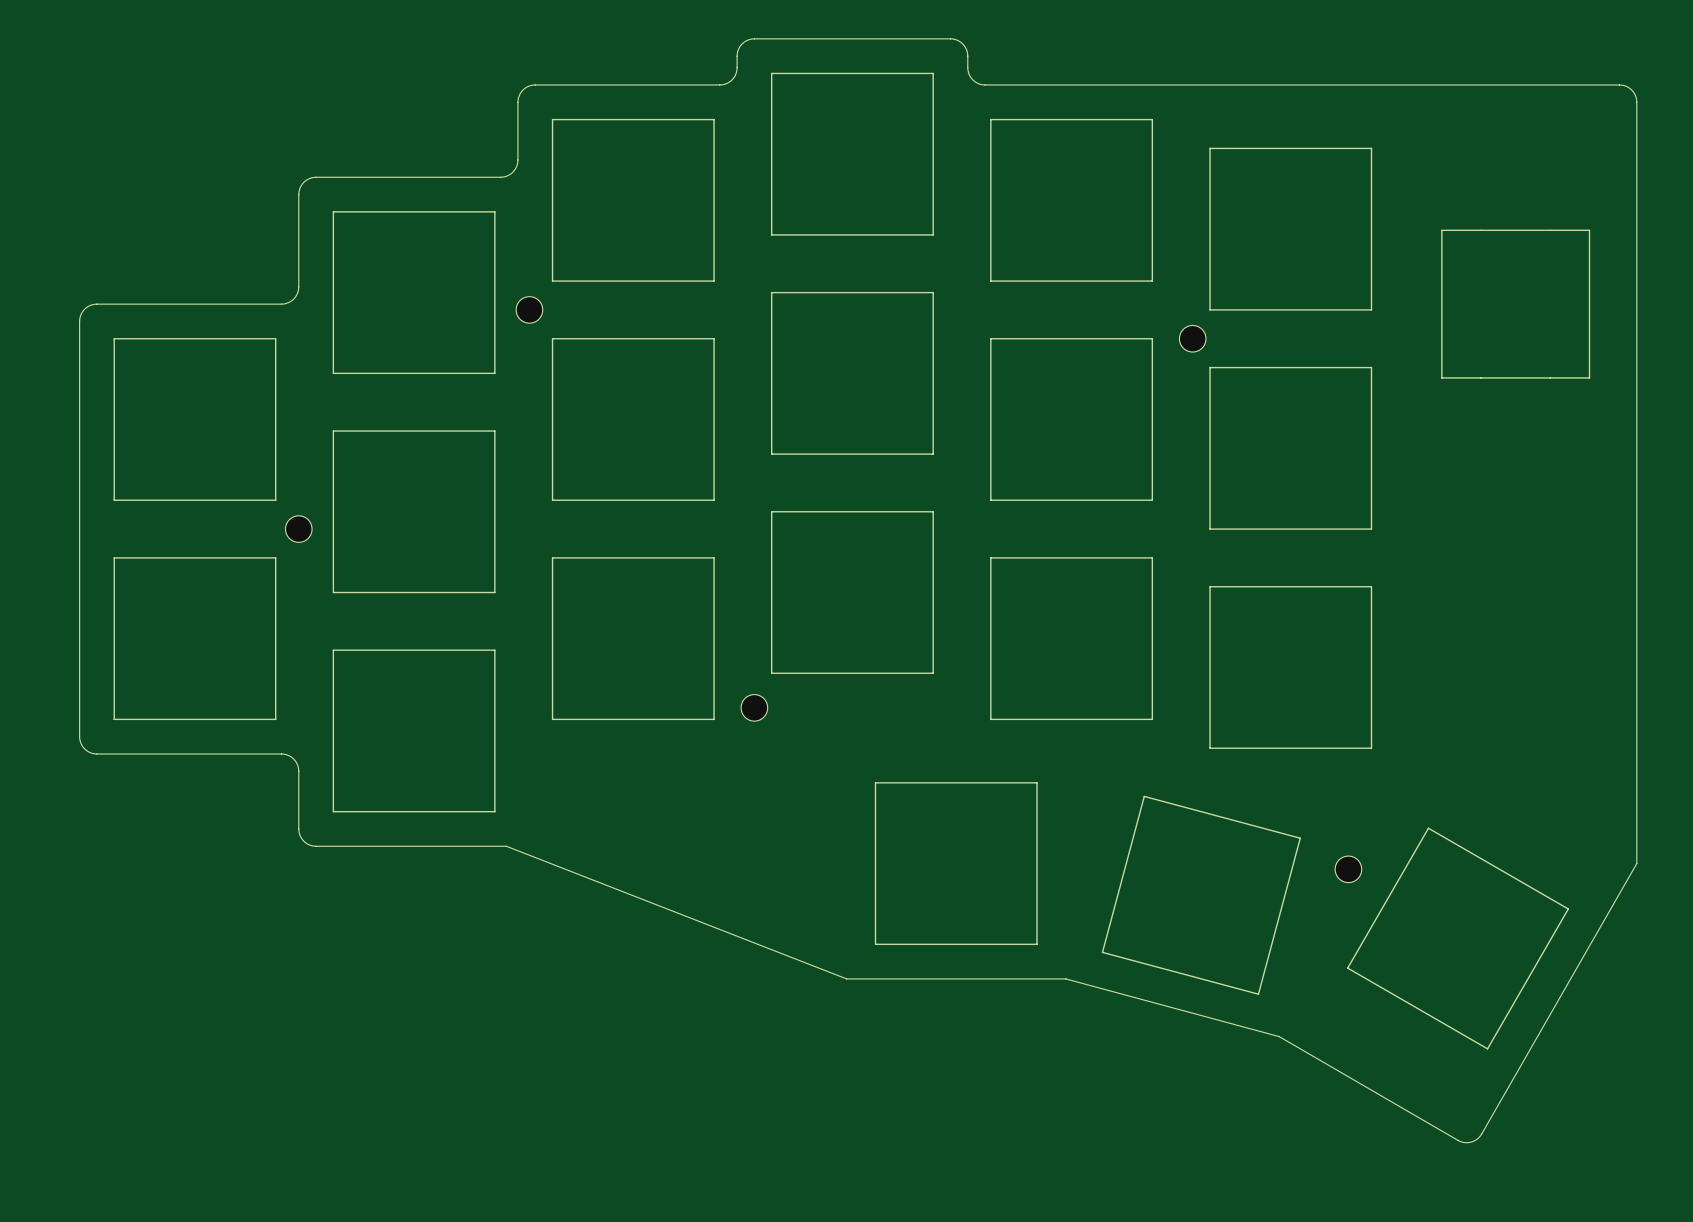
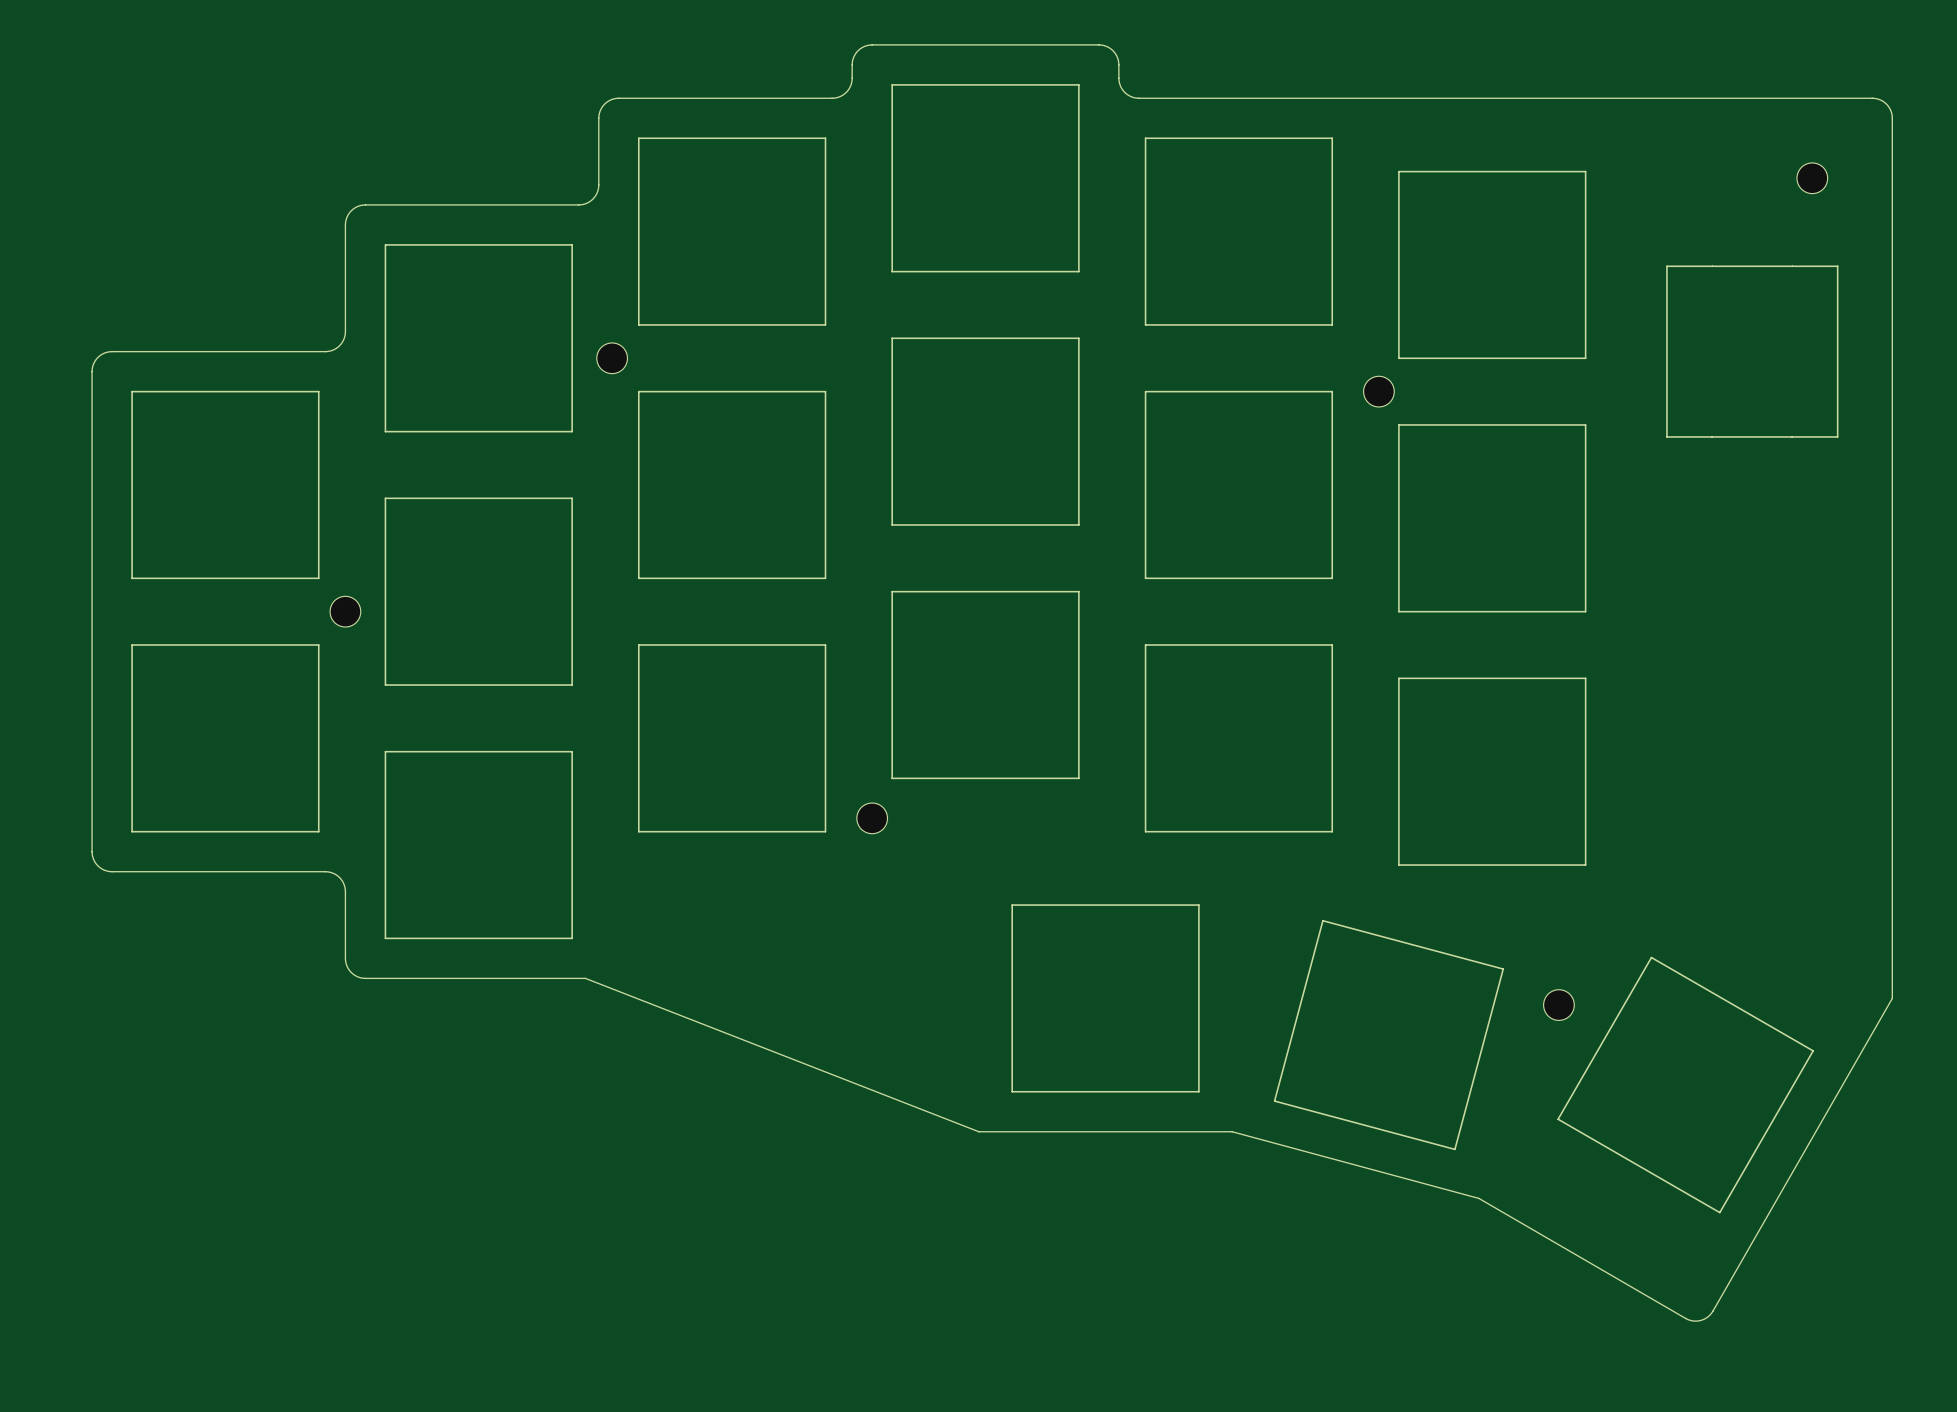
part: none -> (1812, 178)

